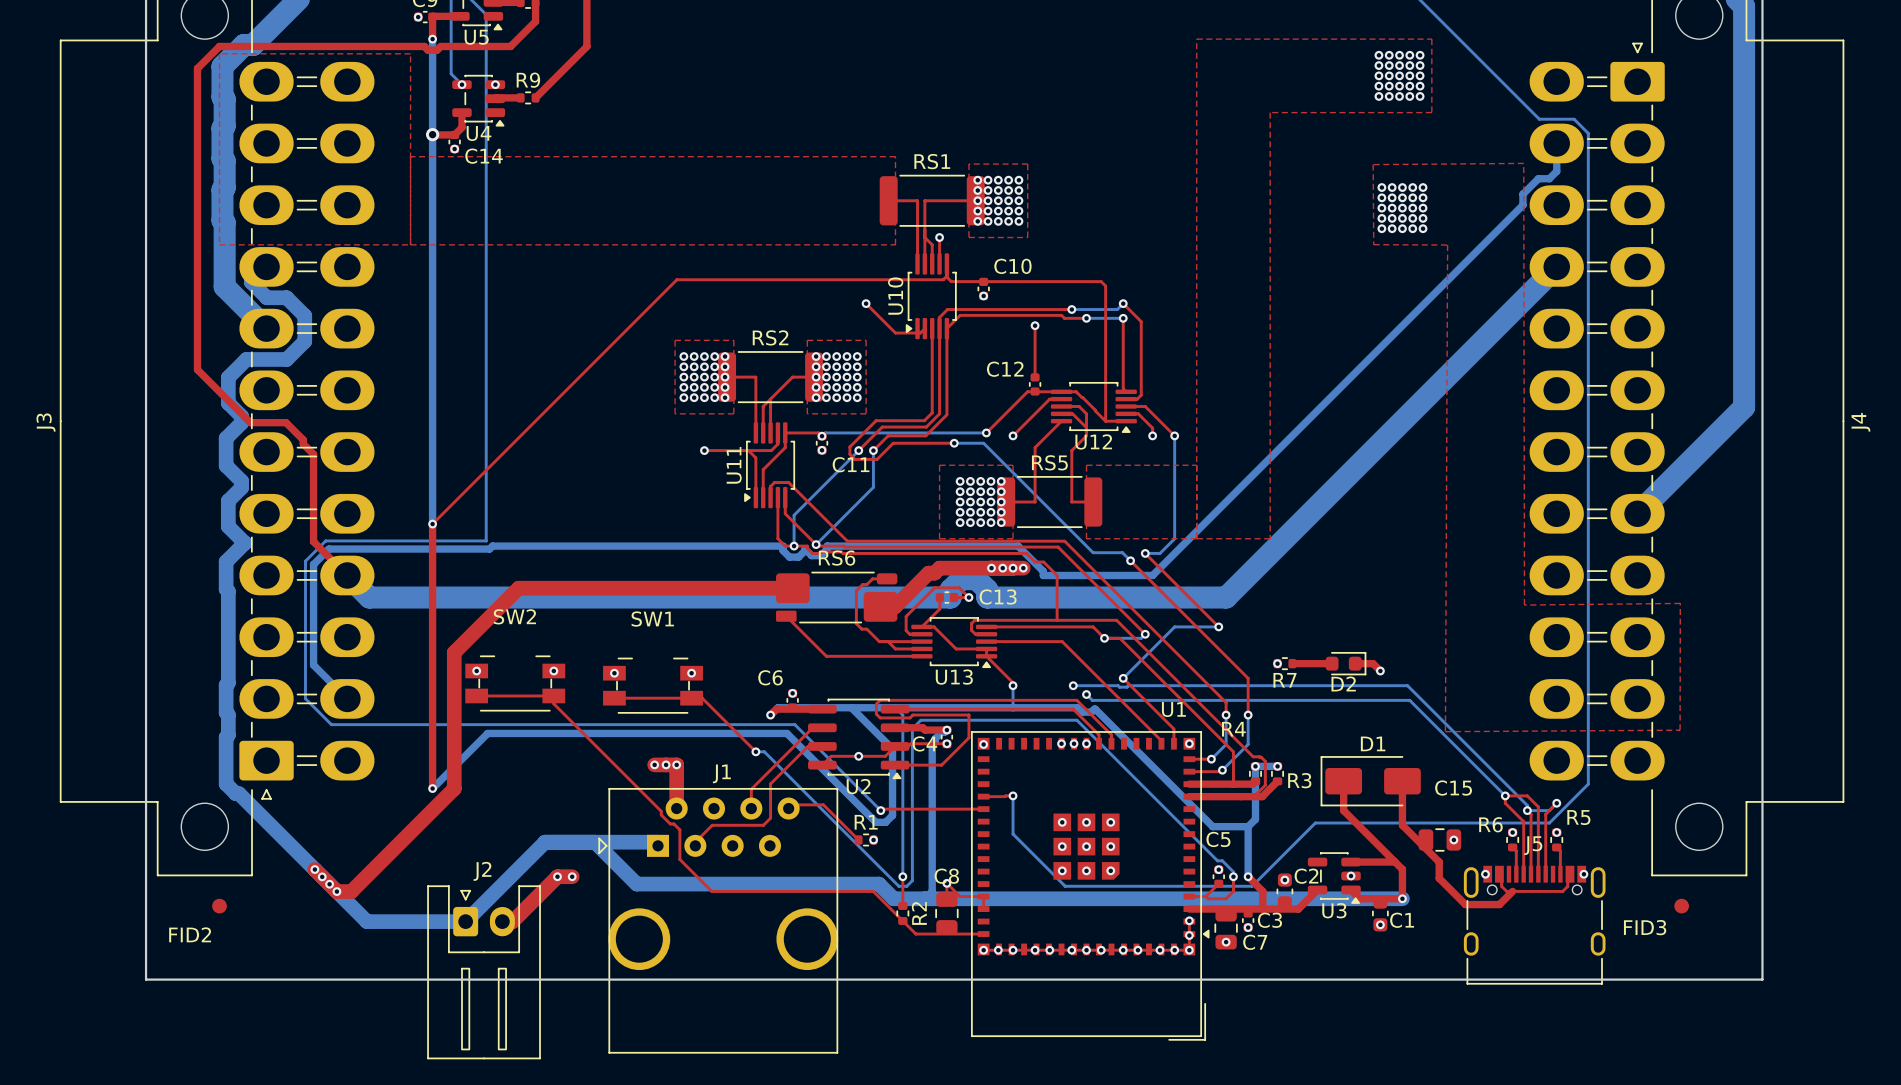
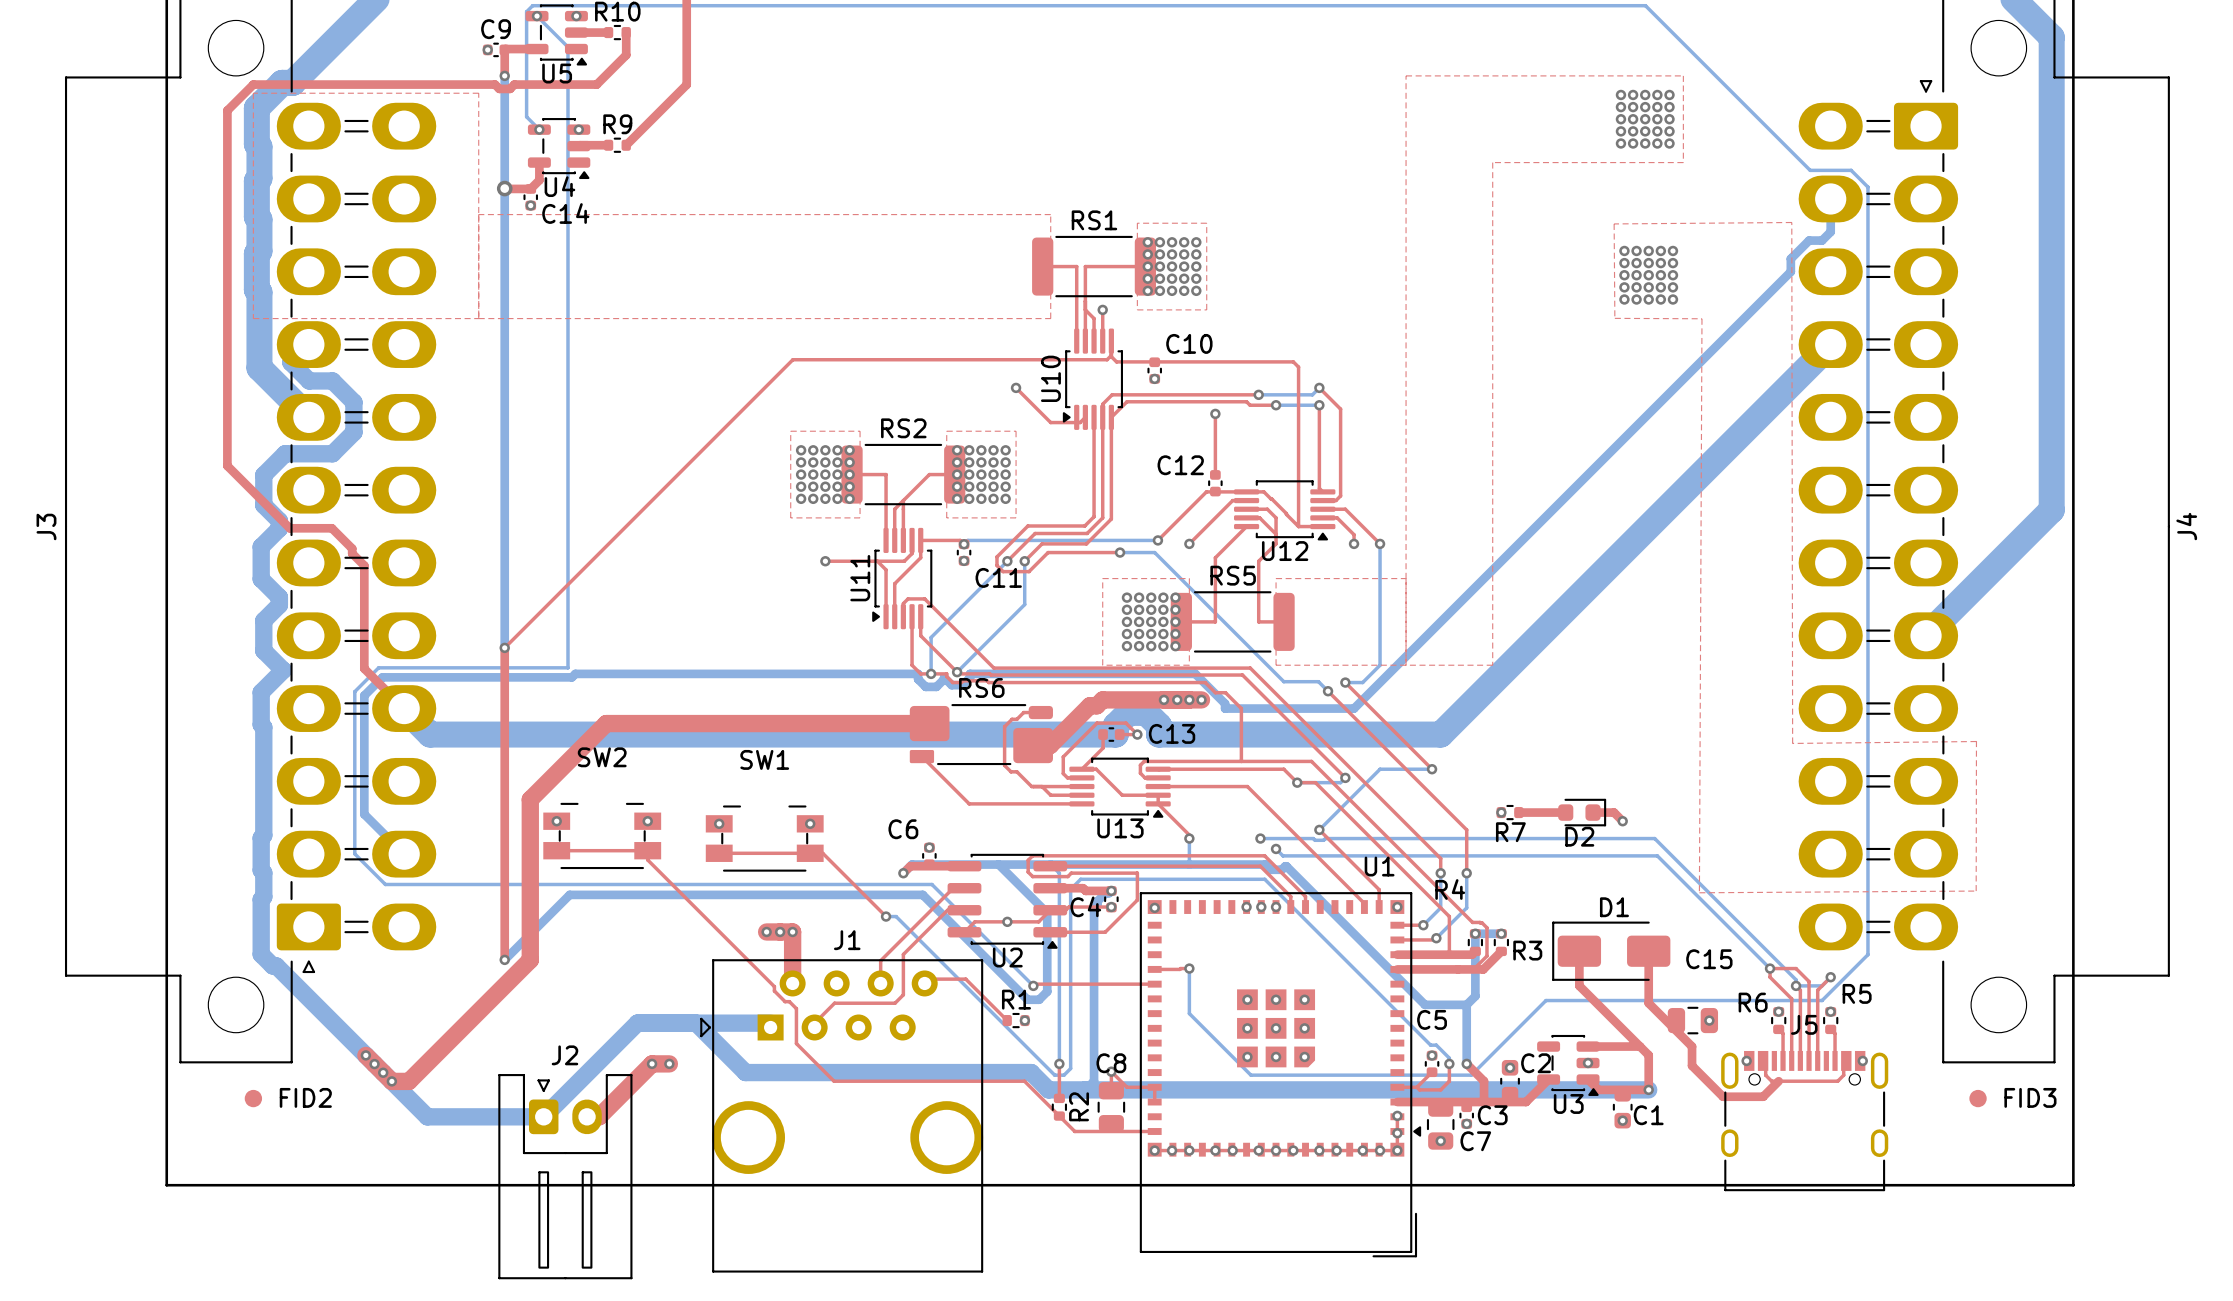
FID3 name position: FID3 (1645, 927) -> FID3 (2030, 1097)
FID2 name position: FID2 (190, 934) -> FID2 (305, 1097)

